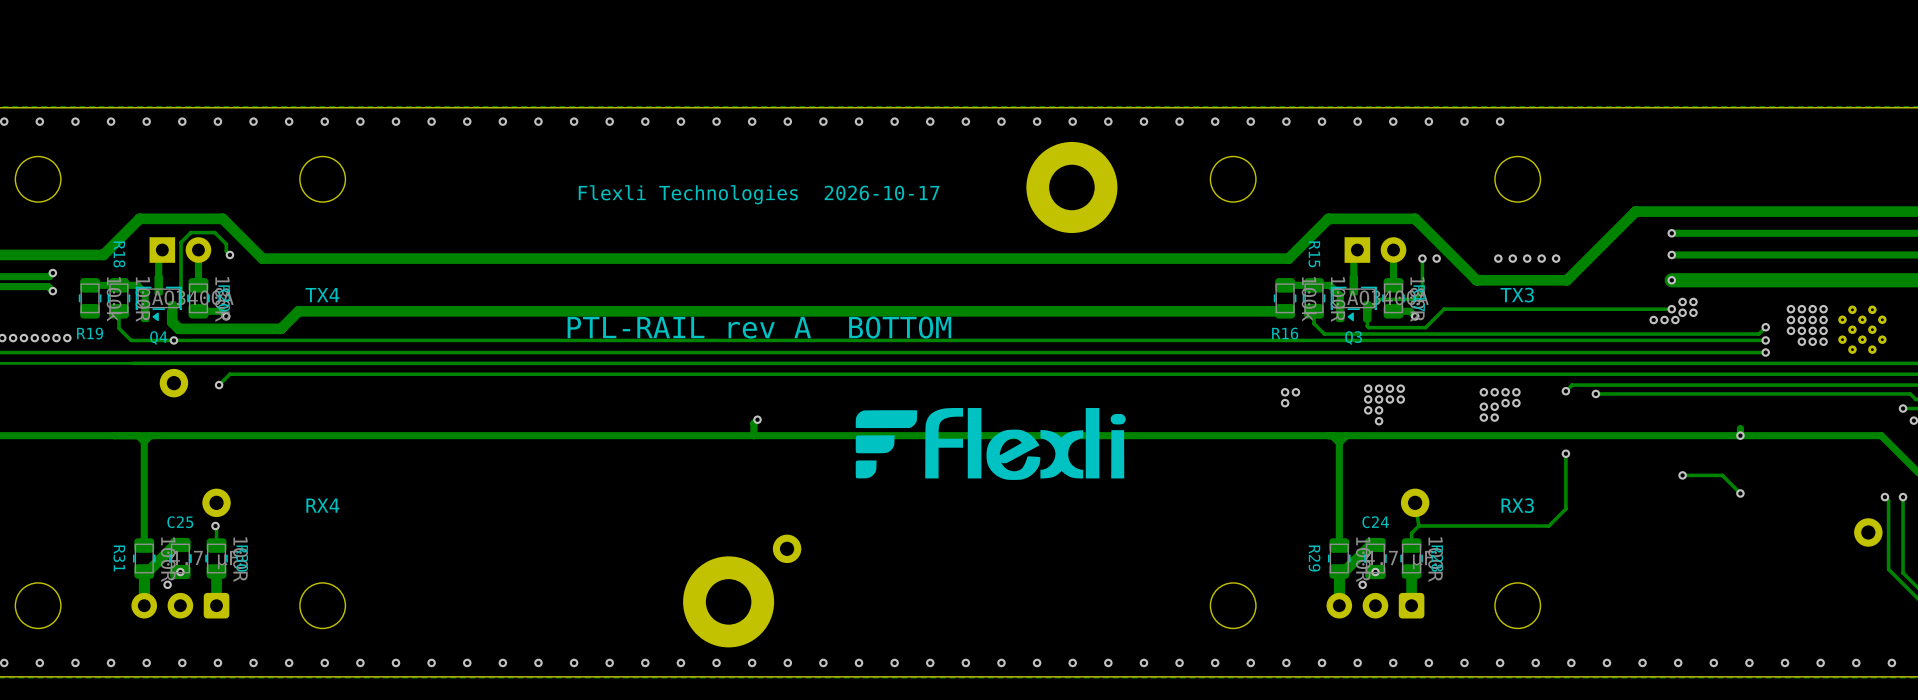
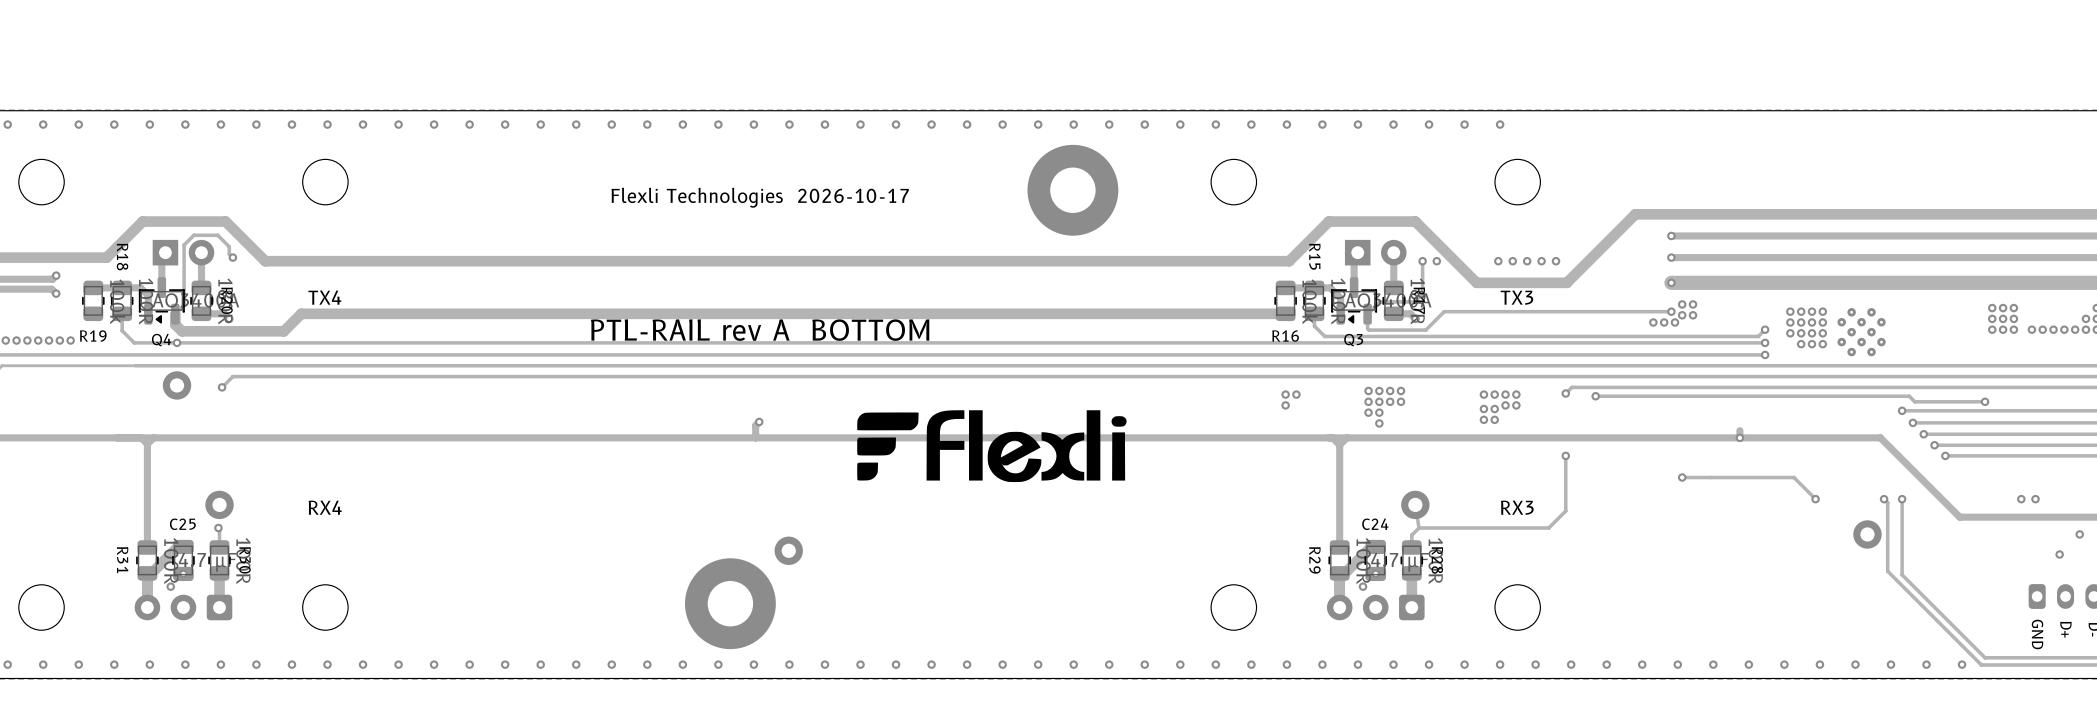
track: (1722, 475) (1740, 493) -> (1721, 477) (1793, 477) (1815, 499)
via position: (1740, 493) -> (1815, 499)

